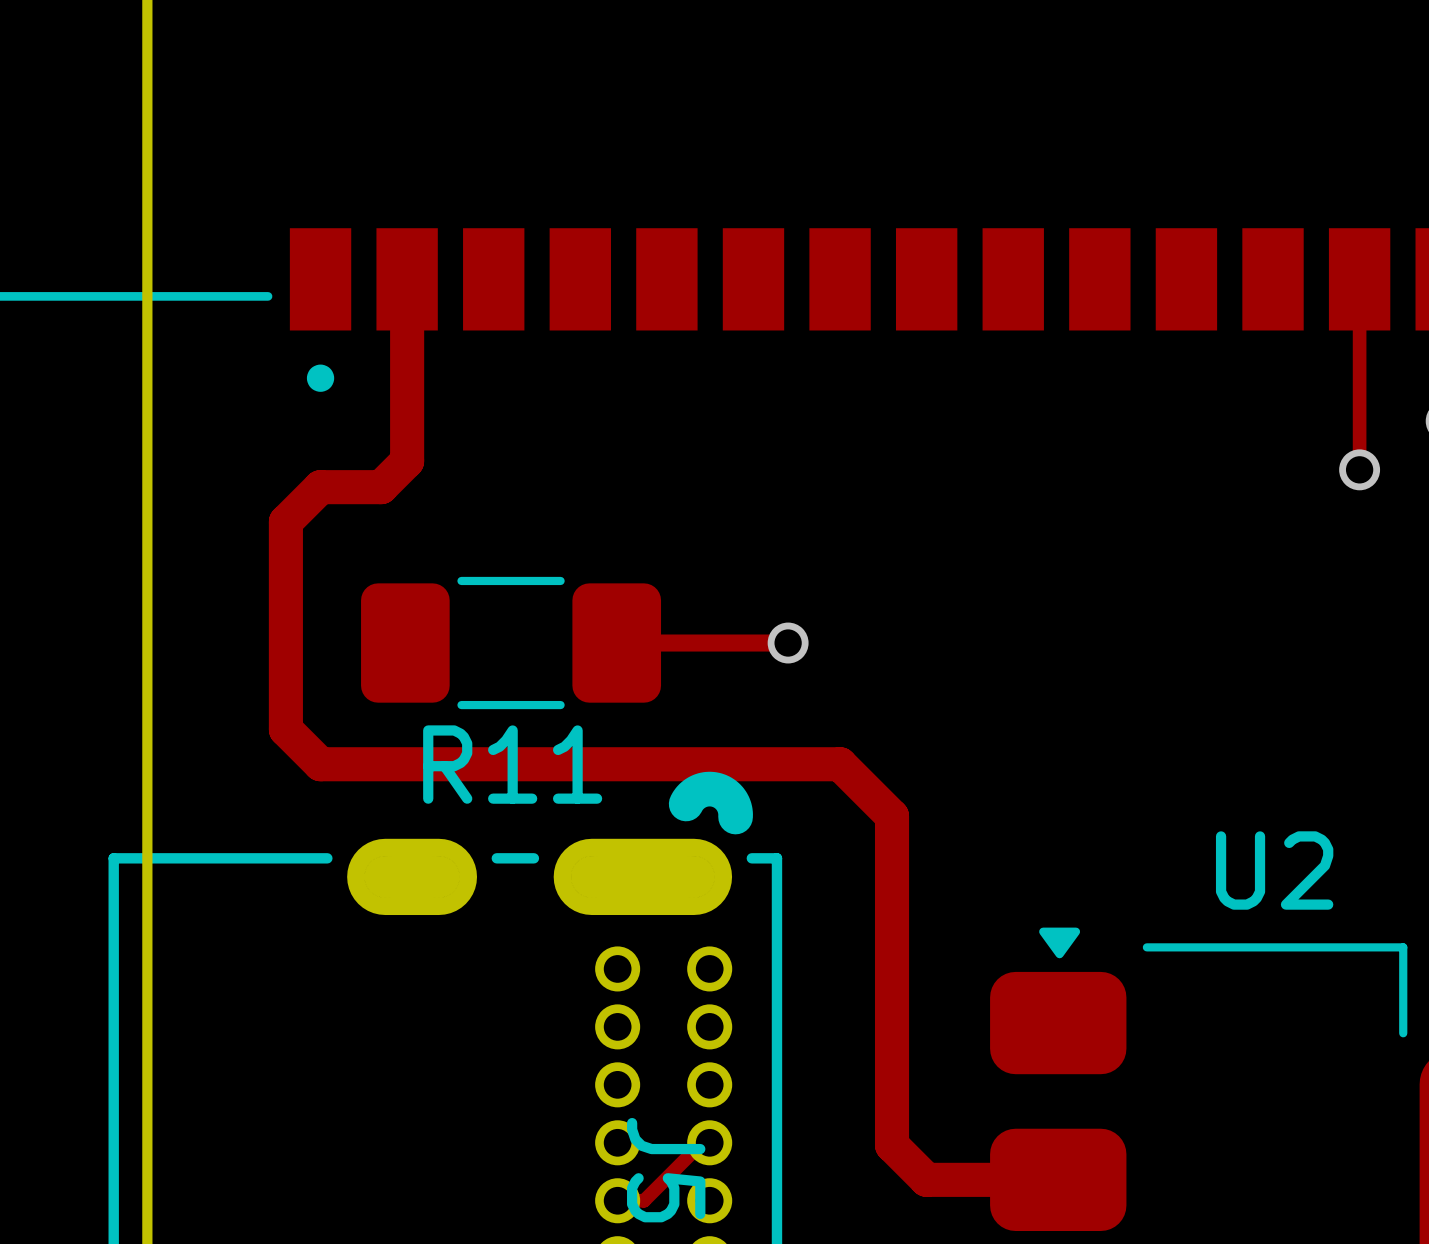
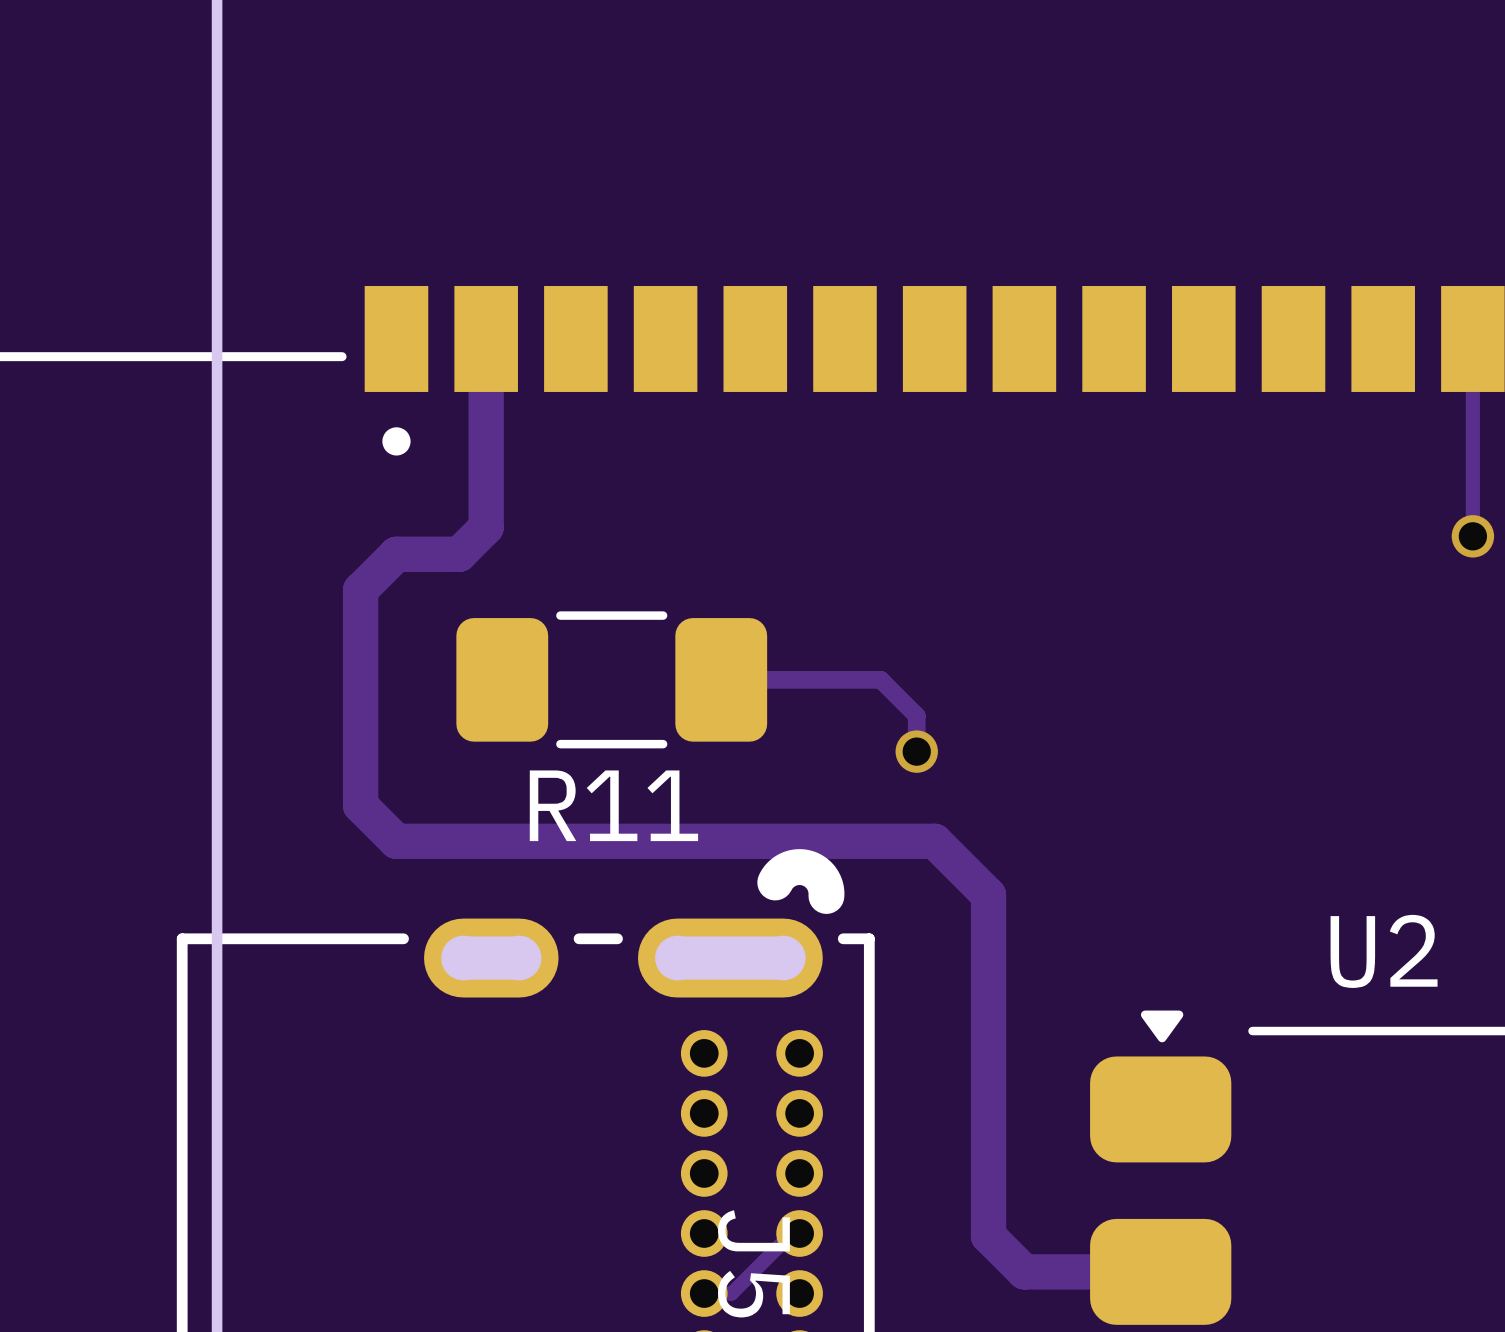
track: none -> (721, 679) (880, 679) (916, 715) (916, 751)
R11 position: (511, 643) -> (611, 679)
track: (616, 643) (788, 643) -> none
via position: (788, 643) -> (916, 751)

